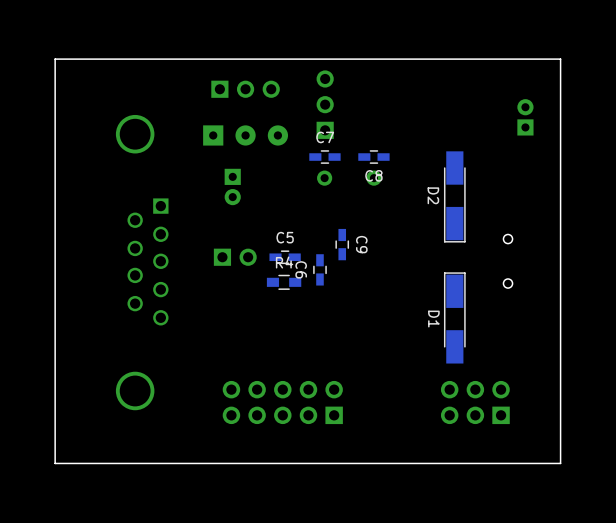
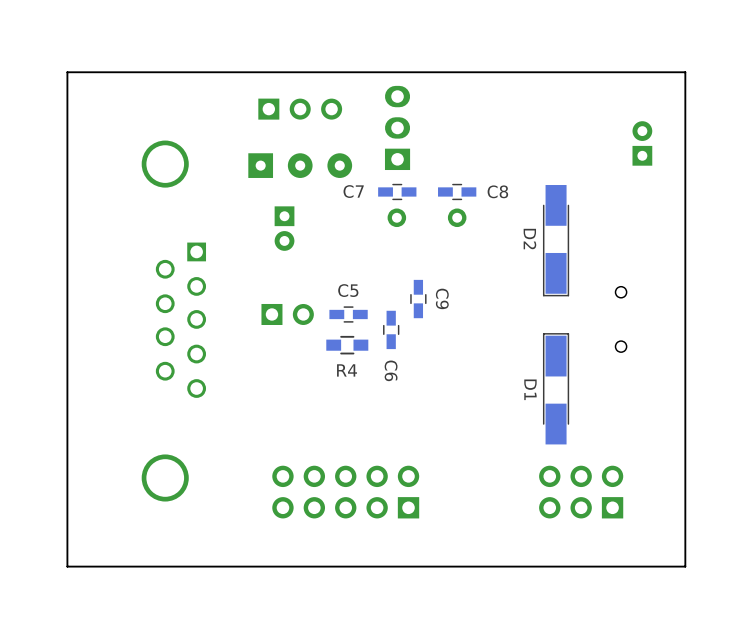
part footprint: [316, 70, 334, 139] -> [384, 85, 411, 171]
C7 name position: C7 (325, 137) -> C7 (353, 191)
C8 name position: C8 (373, 175) -> C8 (497, 191)
R4 name position: R4 (284, 262) -> R4 (347, 370)
C6 name position: C6 (301, 269) -> C6 (391, 370)

